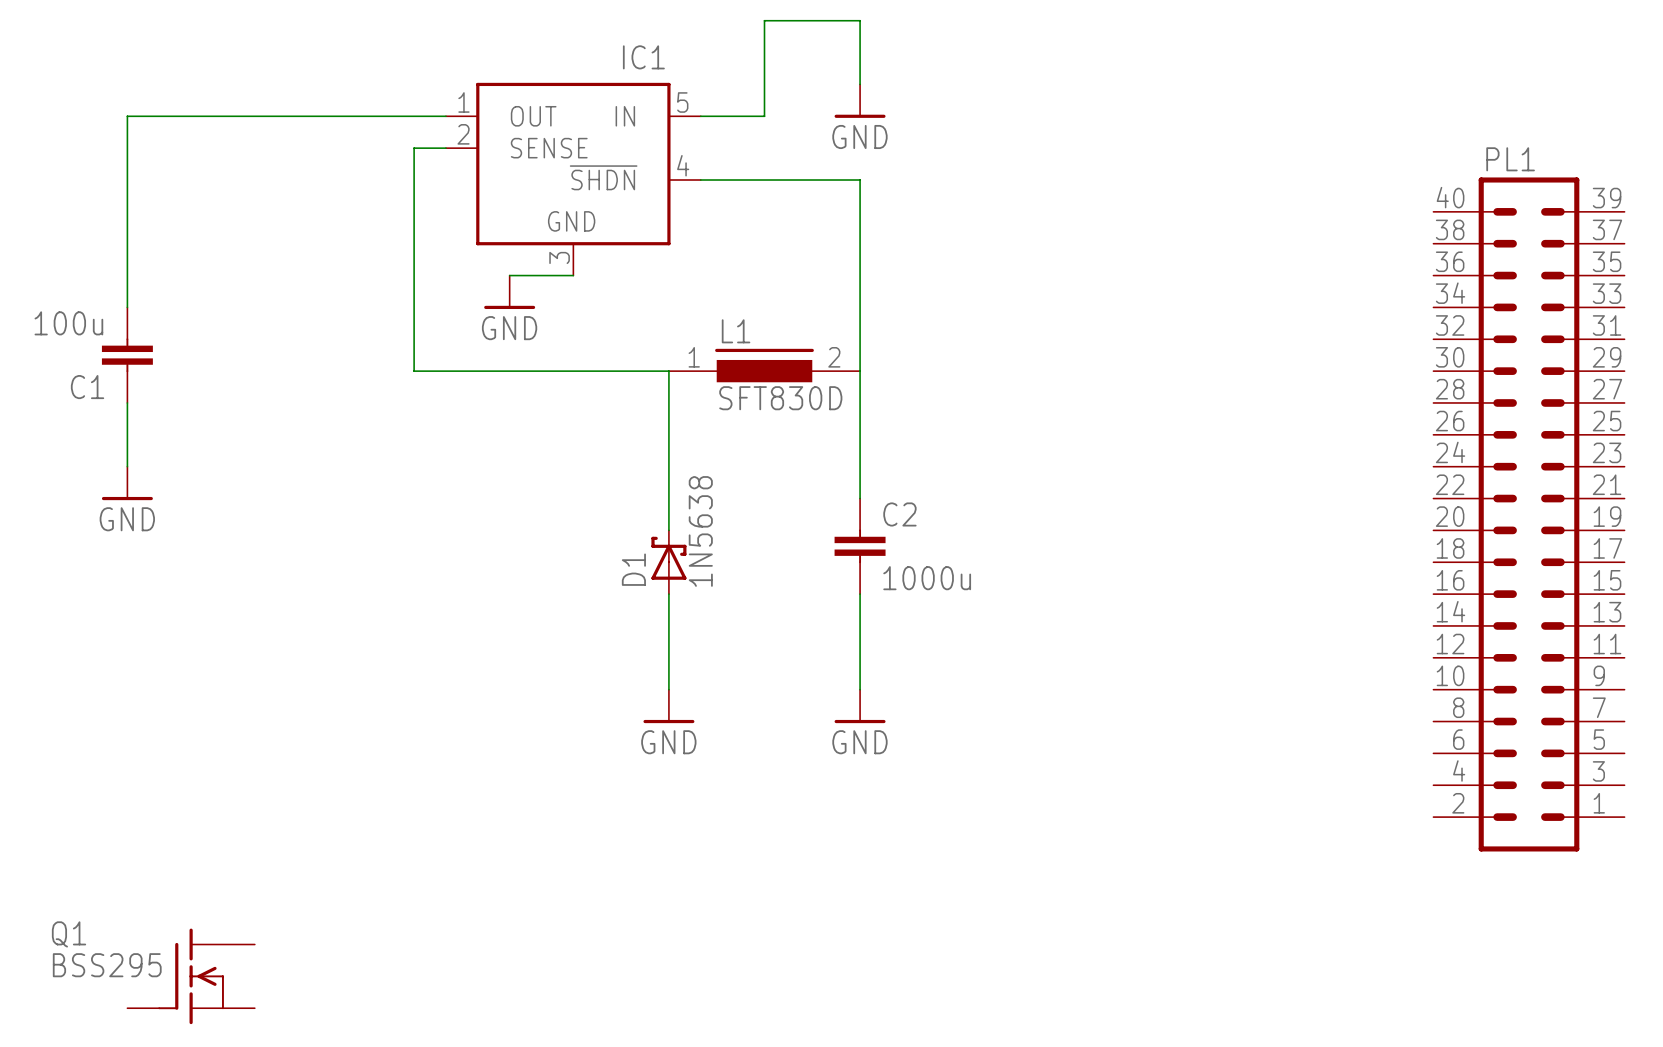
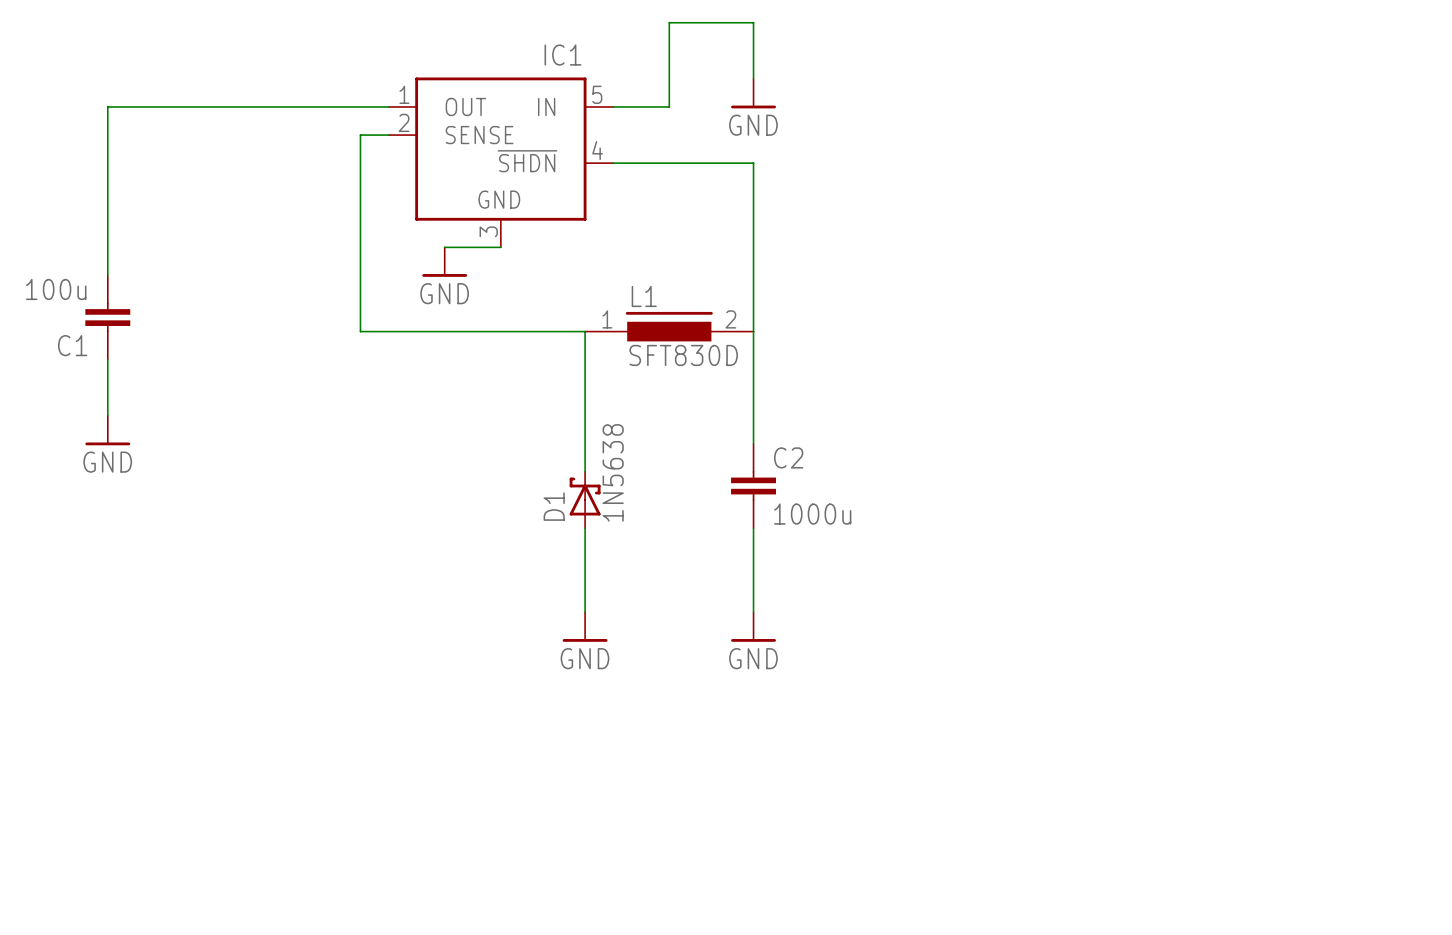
PL1: (1529, 514) -> none
Q1: BSS295 (191, 976) -> none

